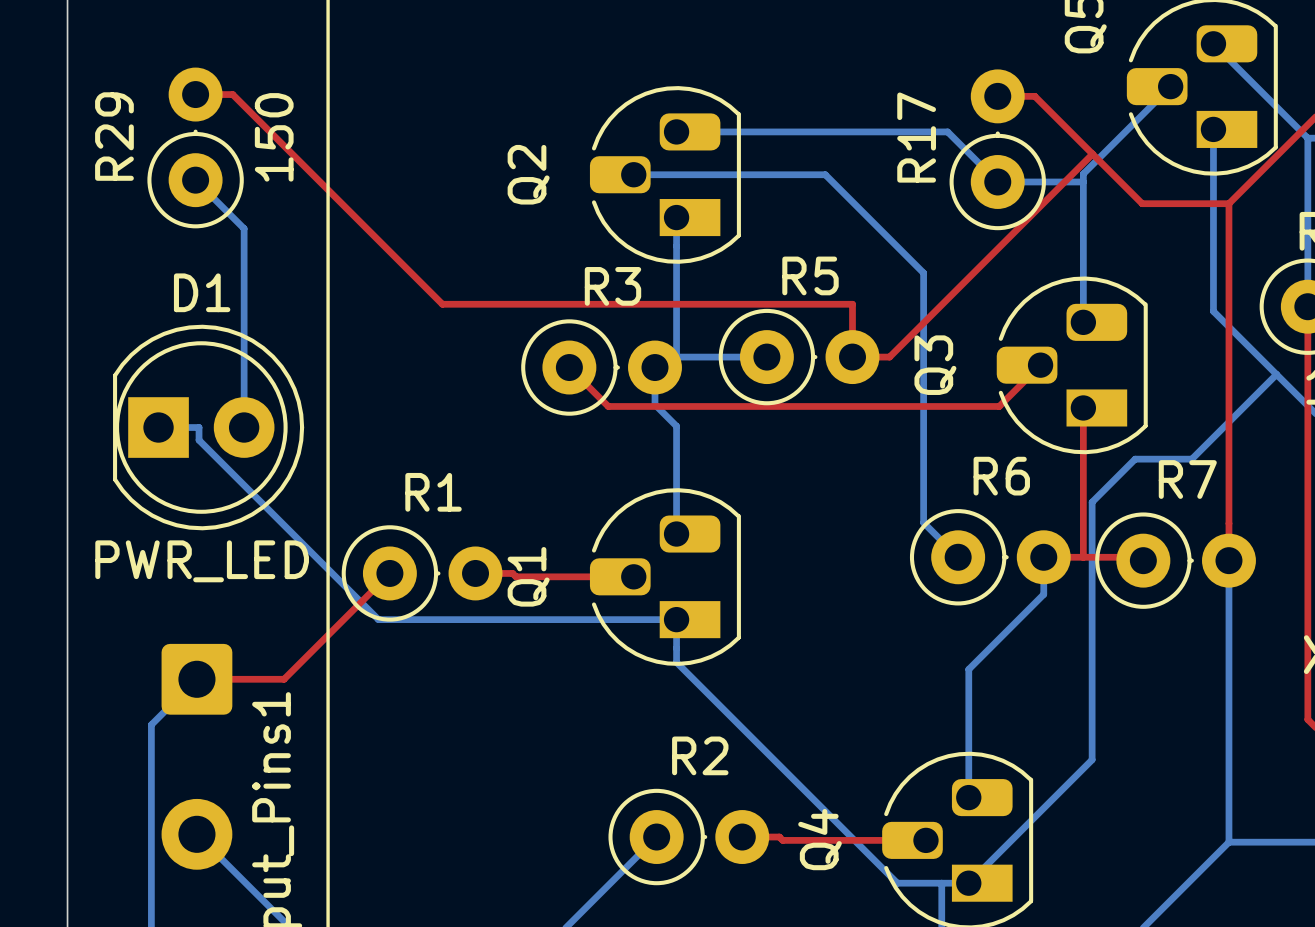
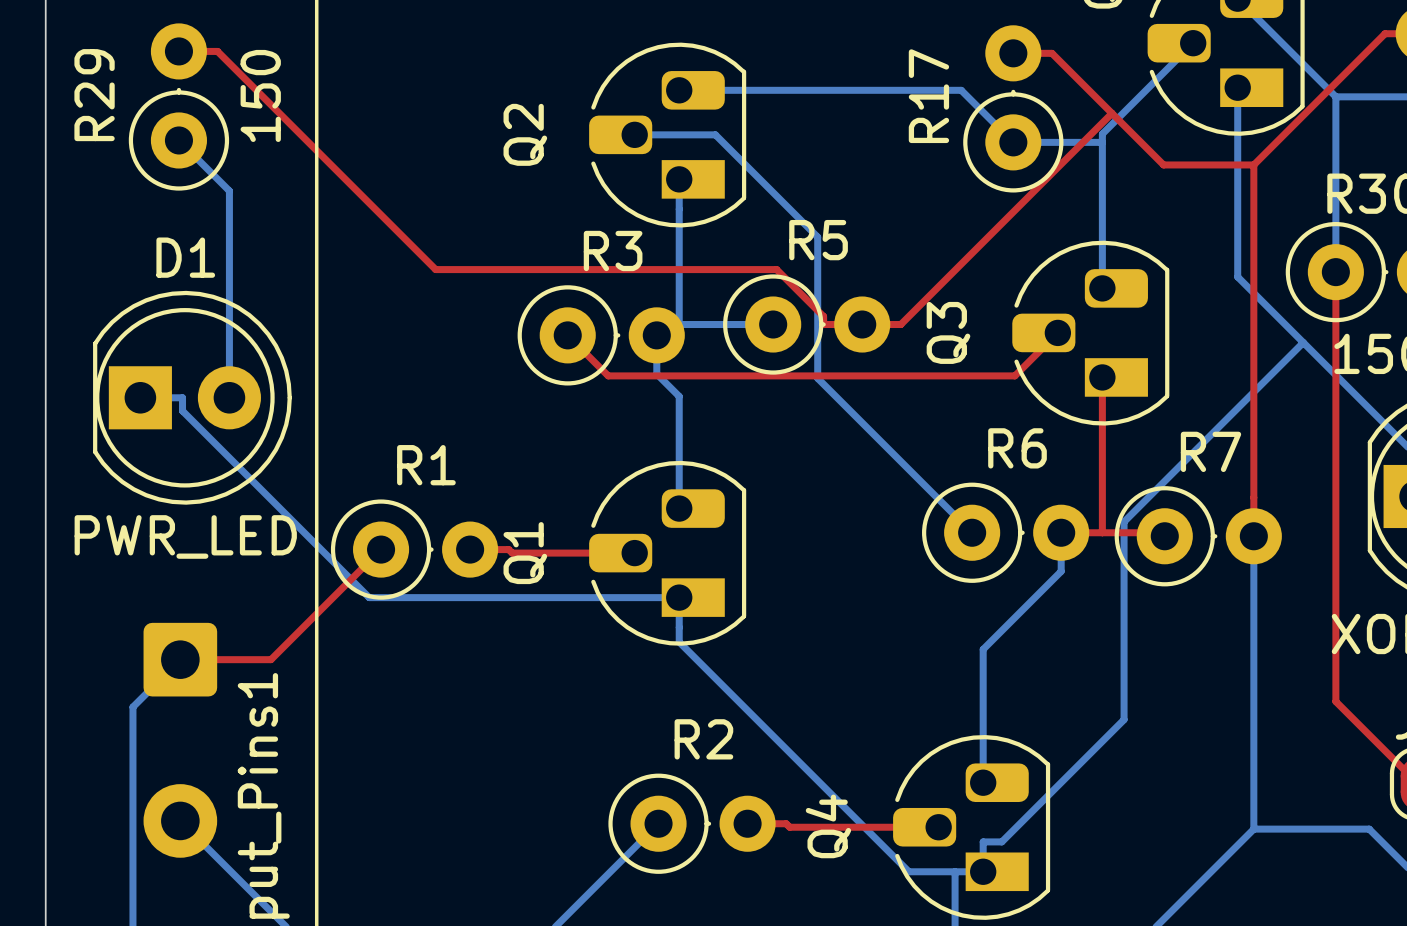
bottom track: (711, 174) (825, 174) (923, 273) (923, 522) -> (715, 134) (817, 237) (817, 378) (936, 496)
top track: (770, 304) (852, 304) (852, 357) -> (776, 269) (823, 316) (823, 324) (862, 324)
bottom track: (1191, 459) (1135, 459) (1092, 502) (1092, 759) (968, 883) -> (1215, 430) (1124, 521) (1124, 719) (1001, 841) (983, 841) (983, 871)

